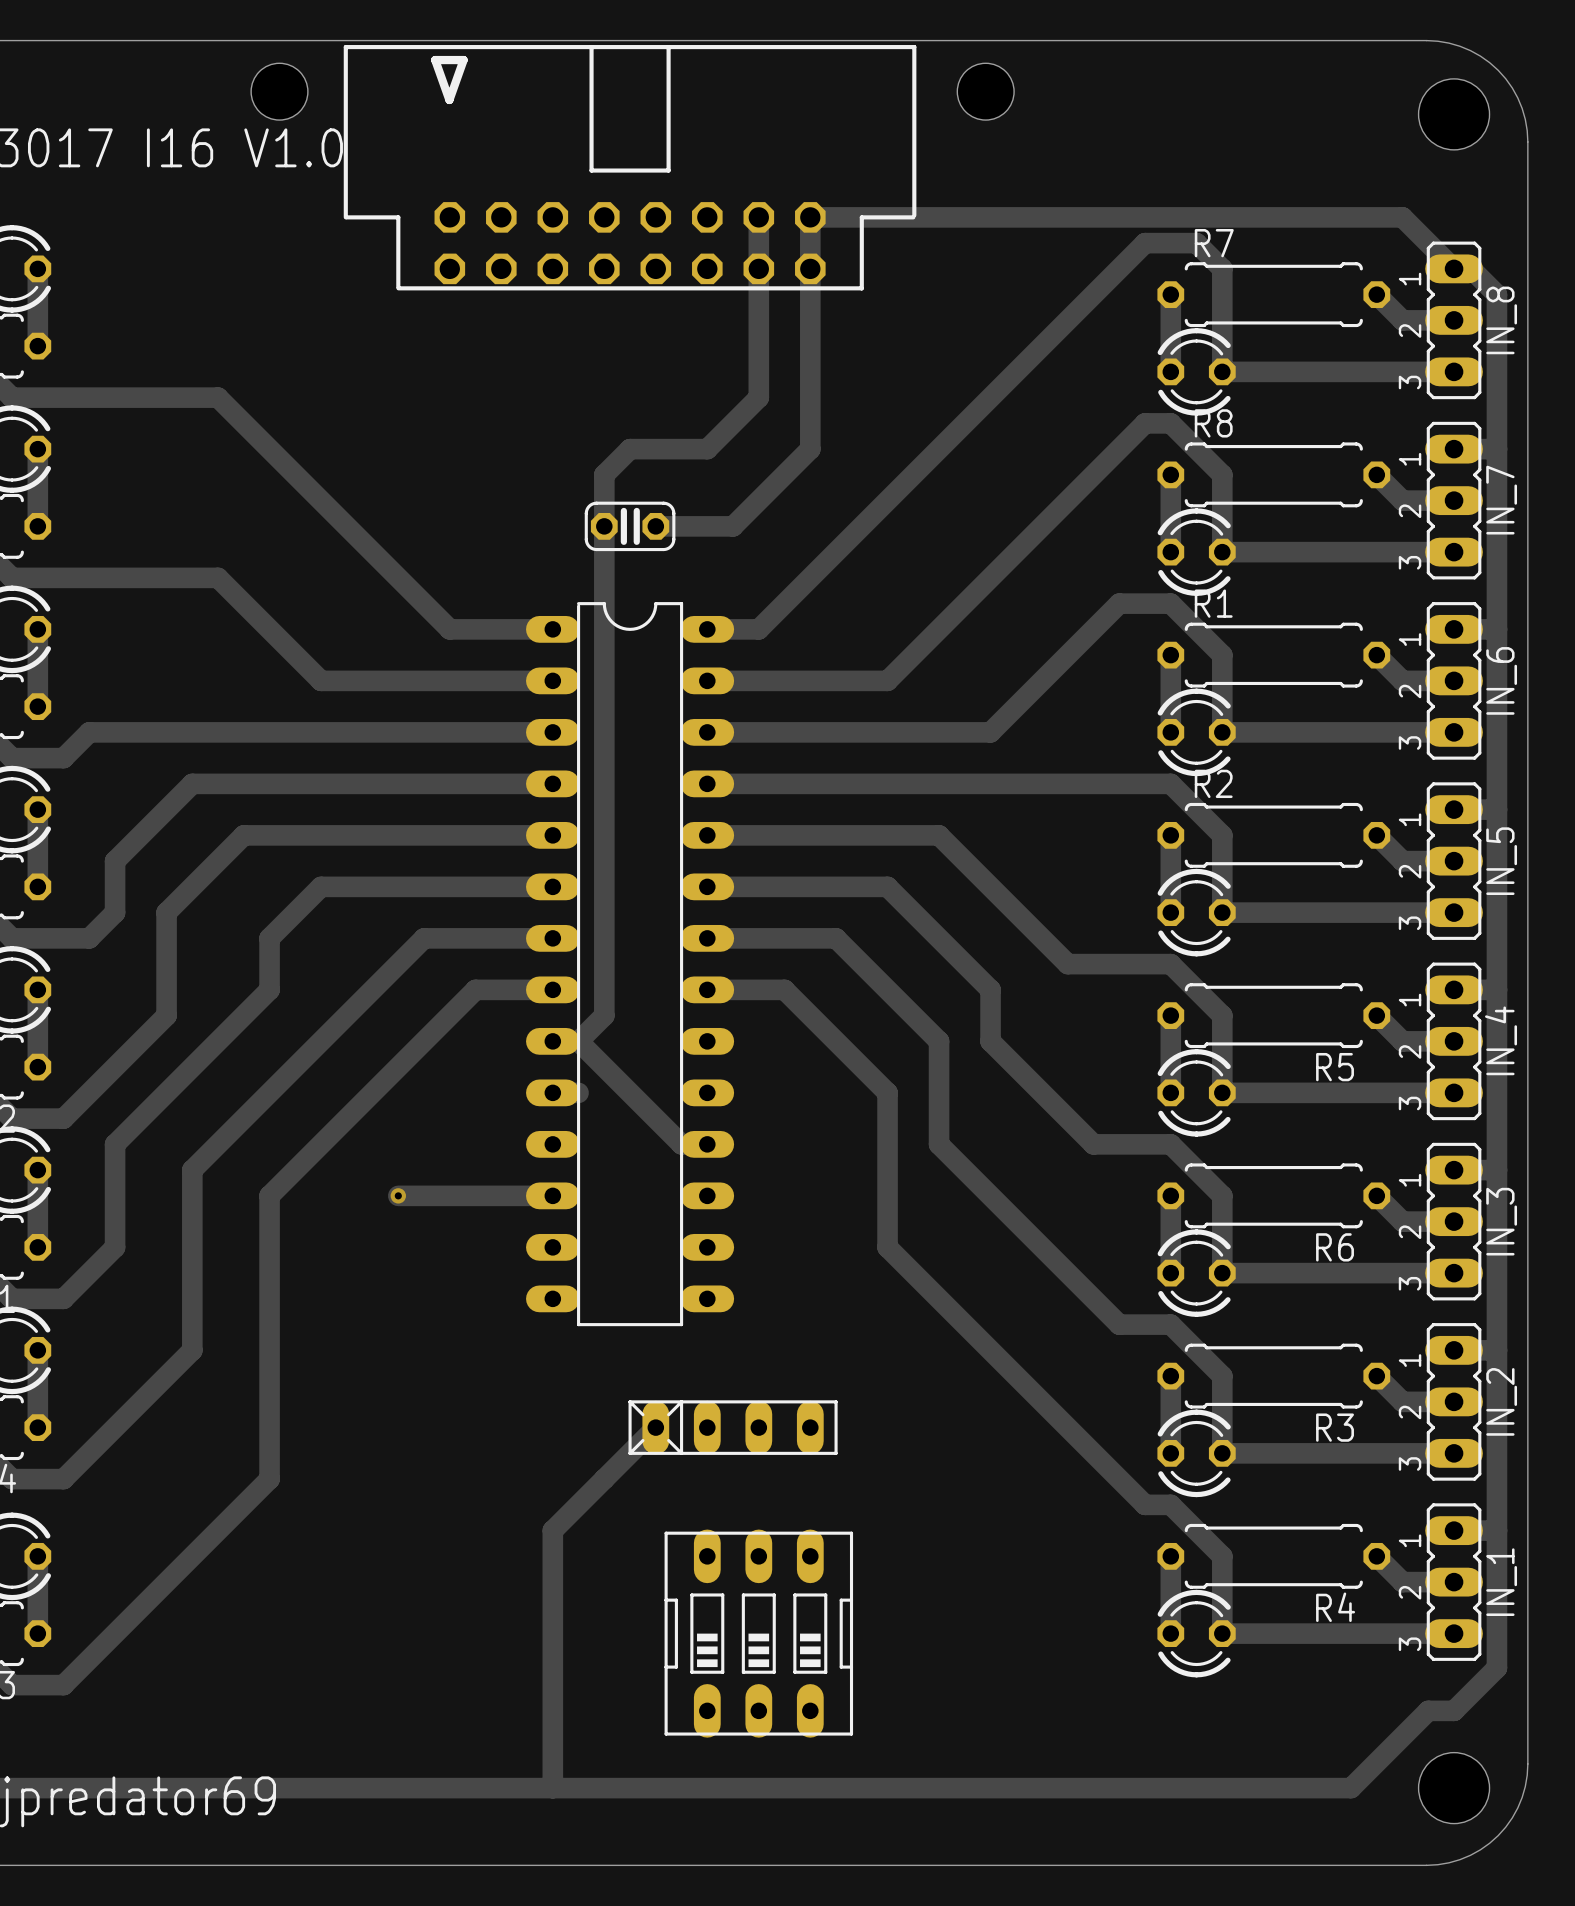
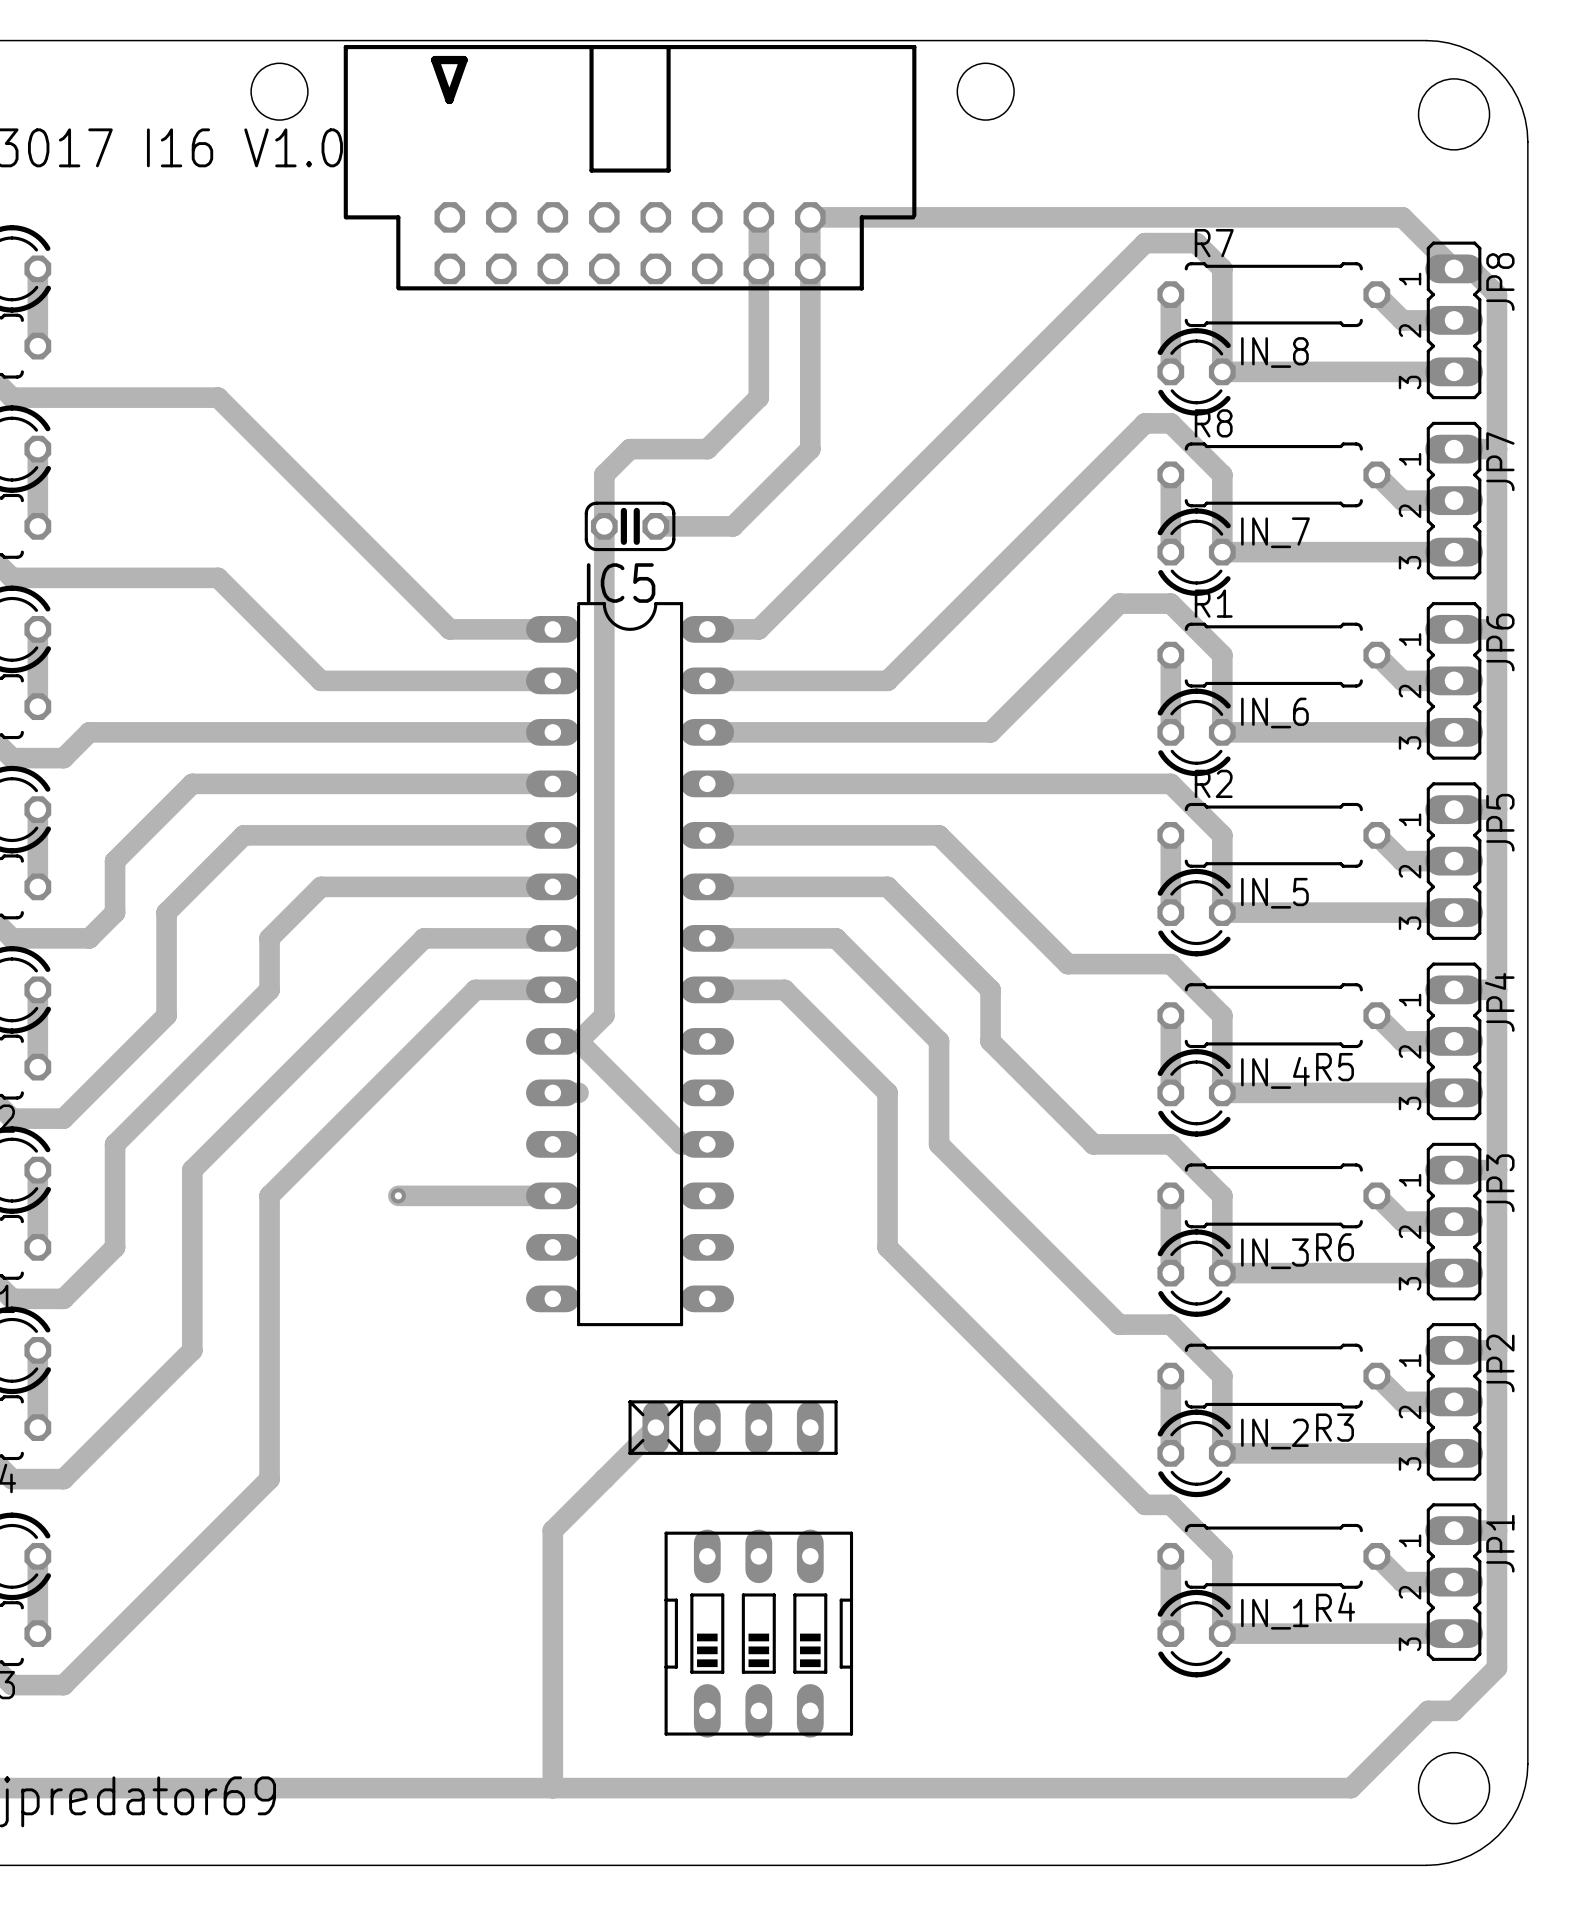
JP8 name: none -> JP8 (1500, 281)
IN_8 name rotation: 0° (1501, 320) -> 90° clockwise (1274, 352)
IN_8 name position: IN_8 (1501, 320) -> IN_8 (1274, 352)
JP7 name: none -> JP7 (1500, 461)
IN_7 name rotation: 0° (1501, 500) -> 90° clockwise (1275, 532)
IN_7 name position: IN_7 (1501, 500) -> IN_7 (1275, 532)
IC5 name: none -> IC5 (621, 583)
JP6 name: none -> JP6 (1500, 642)
IN_6 name rotation: 0° (1501, 680) -> 90° clockwise (1274, 713)
IN_6 name position: IN_6 (1501, 680) -> IN_6 (1274, 713)
JP5 name: none -> JP5 (1500, 822)
IN_5 name rotation: 0° (1501, 861) -> 90° clockwise (1274, 893)
IN_5 name position: IN_5 (1501, 861) -> IN_5 (1274, 893)
JP4 name: none -> JP4 (1499, 1002)
IN_4 name rotation: 0° (1501, 1040) -> 90° clockwise (1275, 1072)
IN_4 name position: IN_4 (1501, 1040) -> IN_4 (1275, 1072)
JP3 name: none -> JP3 (1500, 1183)
IN_3 name rotation: 0° (1501, 1221) -> 90° clockwise (1274, 1253)
IN_3 name position: IN_3 (1501, 1221) -> IN_3 (1274, 1253)
JP2 name: none -> JP2 (1500, 1363)
IN_2 name rotation: 0° (1501, 1401) -> 90° clockwise (1274, 1433)
IN_2 name position: IN_2 (1501, 1401) -> IN_2 (1274, 1433)
JP1 name: none -> JP1 (1500, 1543)
IN_1 name rotation: 0° (1501, 1582) -> 90° clockwise (1274, 1614)
IN_1 name position: IN_1 (1501, 1582) -> IN_1 (1274, 1614)

